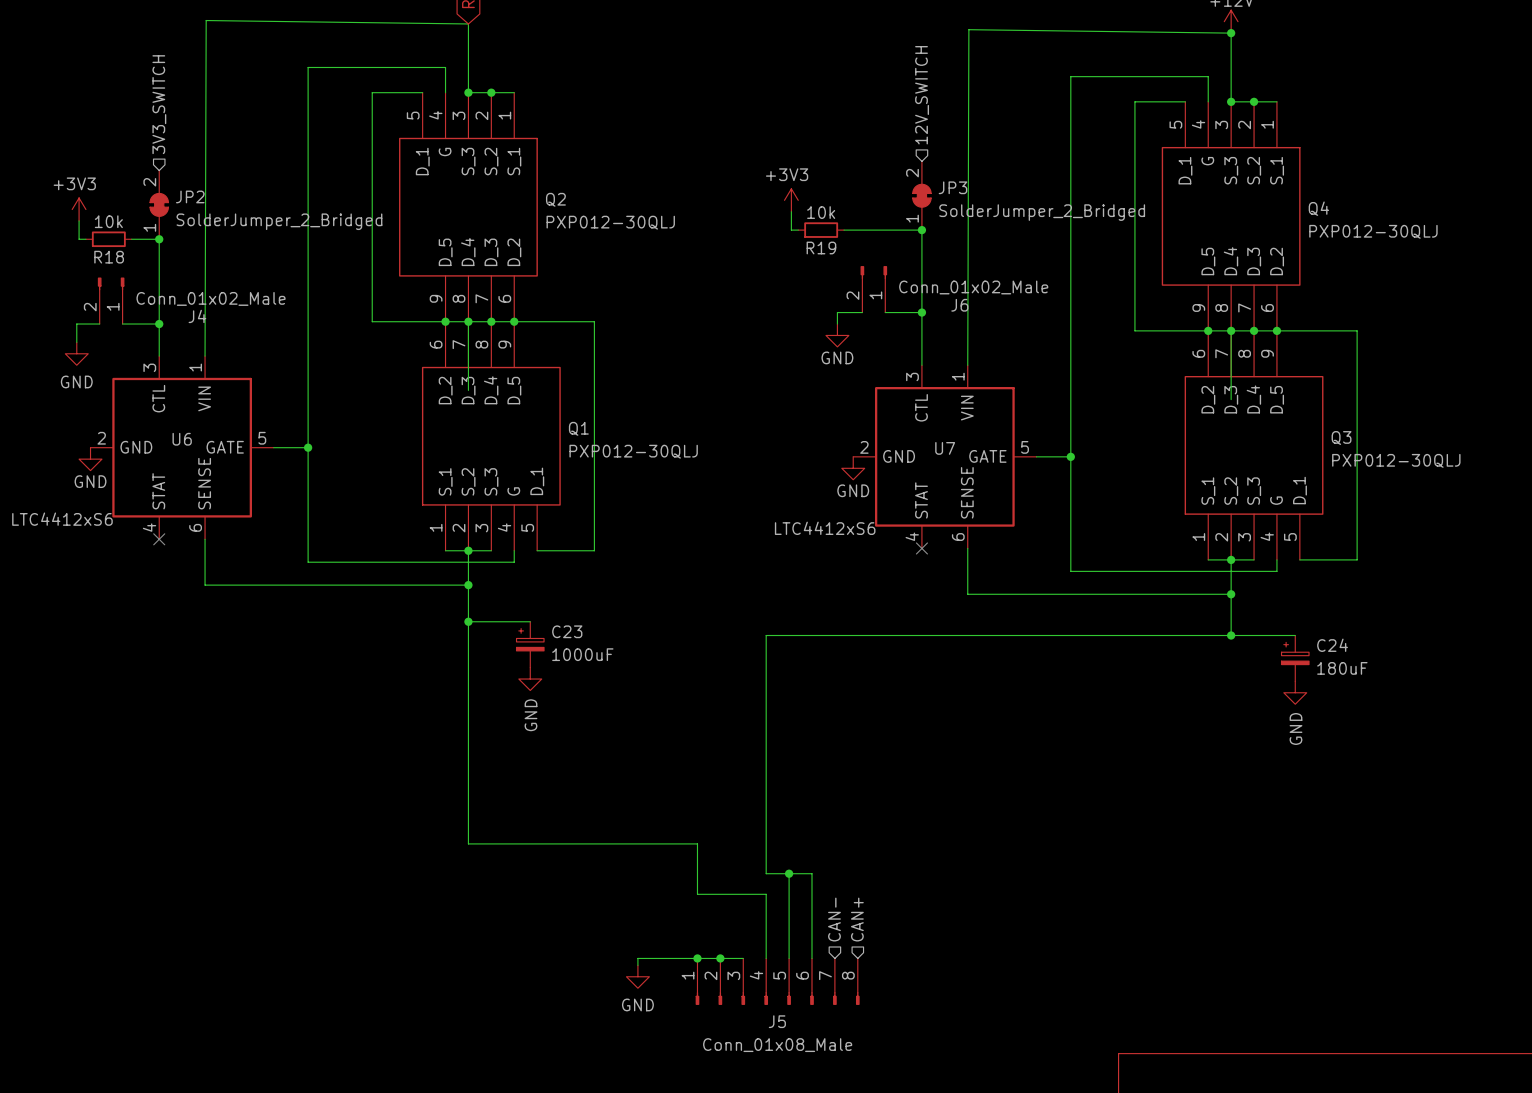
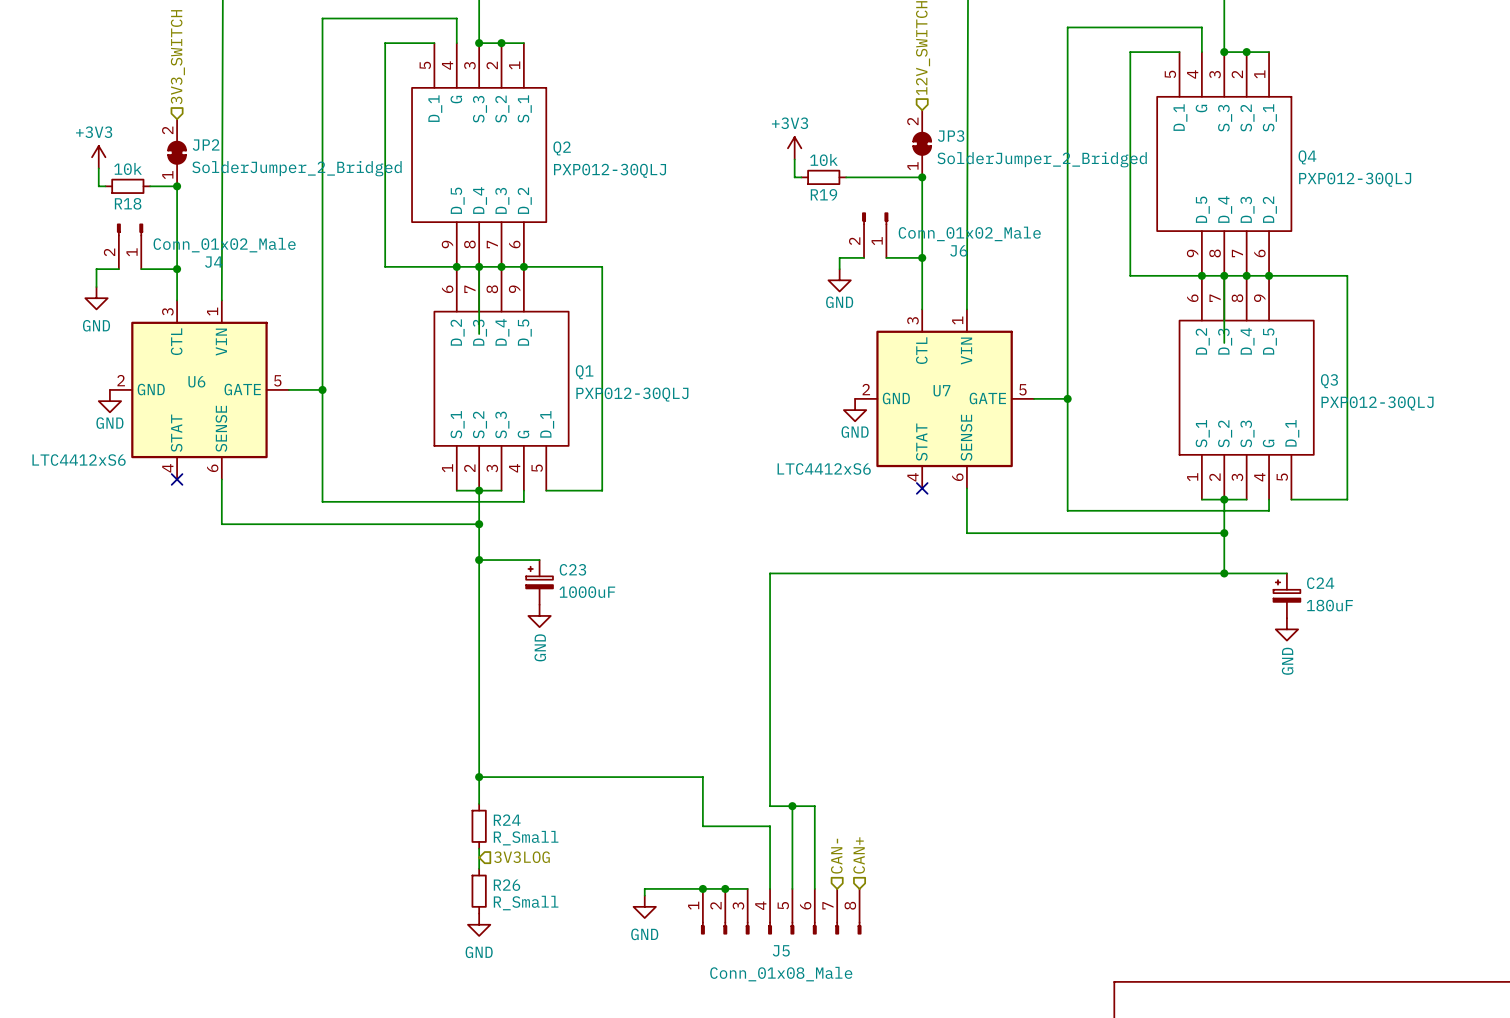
wire: none -> (479, 777) (479, 803)
junction: none -> (479, 777)
R24: none -> R_Small (479, 826)
wire: none -> (479, 848) (479, 868)
hierarchical label: none -> 3V3LOG (521, 857)
R26: none -> R_Small (479, 891)
power symbol: none -> GND (479, 924)

